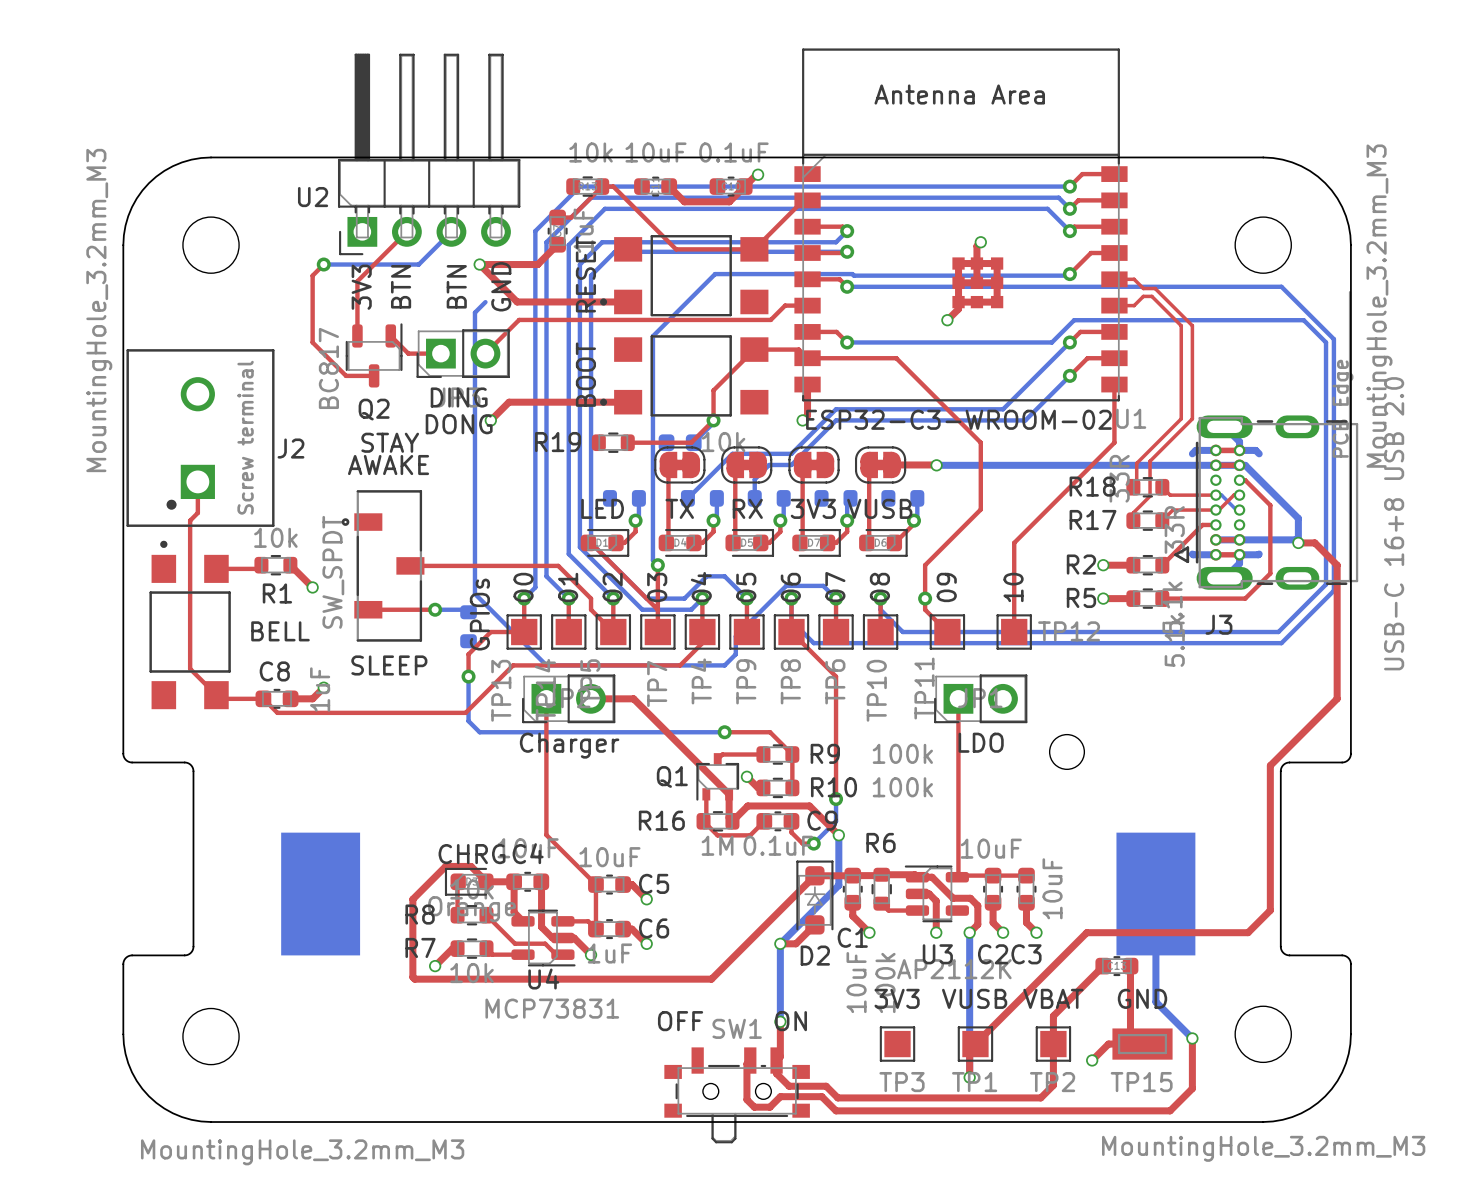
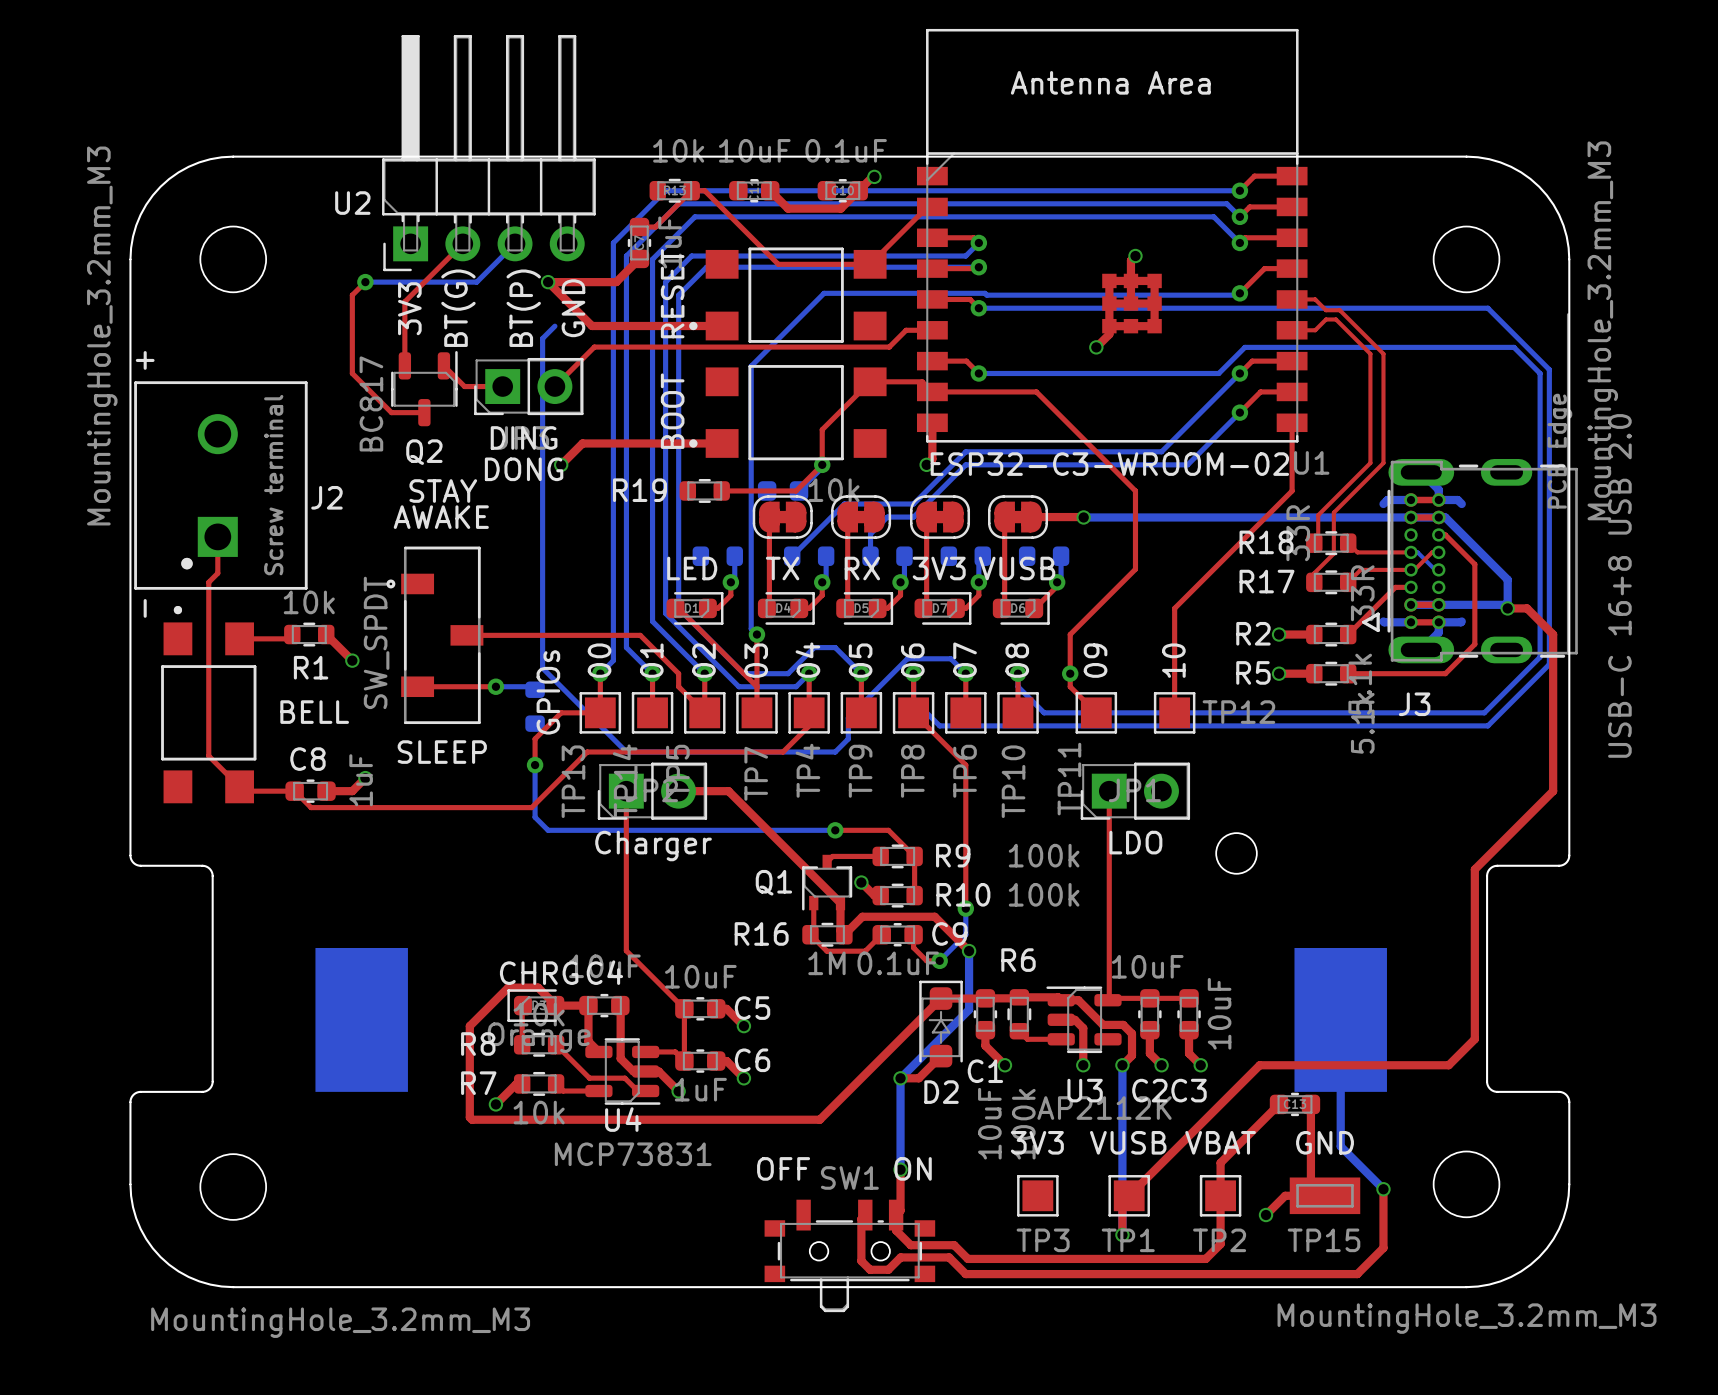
U2 text: BTN (401, 286) -> BT(G) (458, 308)
U2 text: BTN (456, 286) -> BT(P) (523, 308)
J2 text: none -> + (145, 360)
J2 text: none -> - (145, 608)

